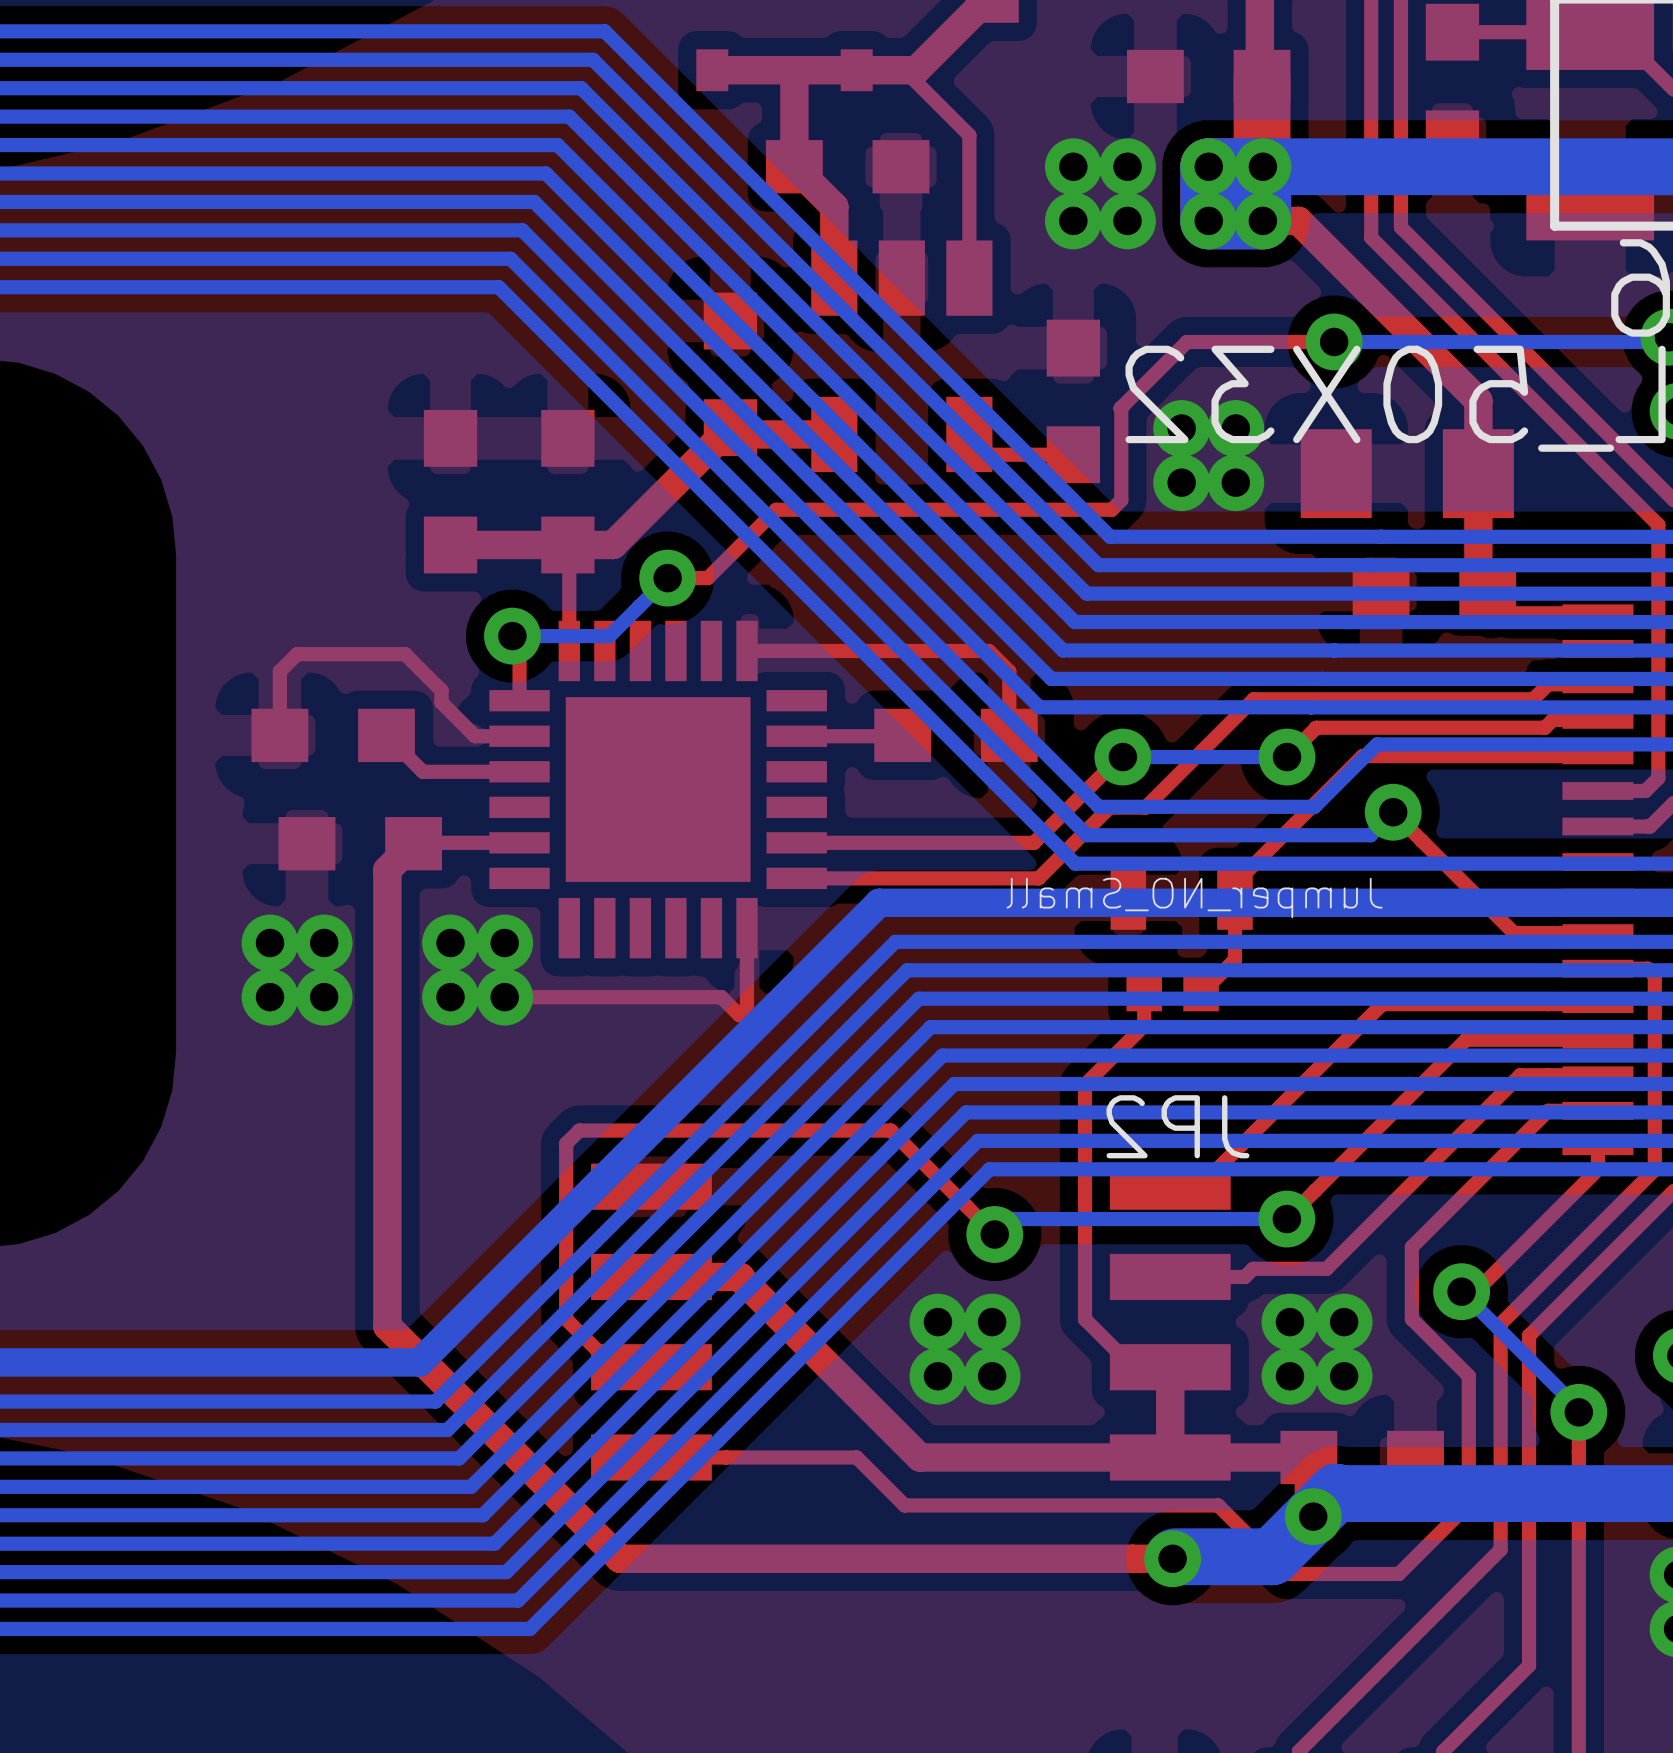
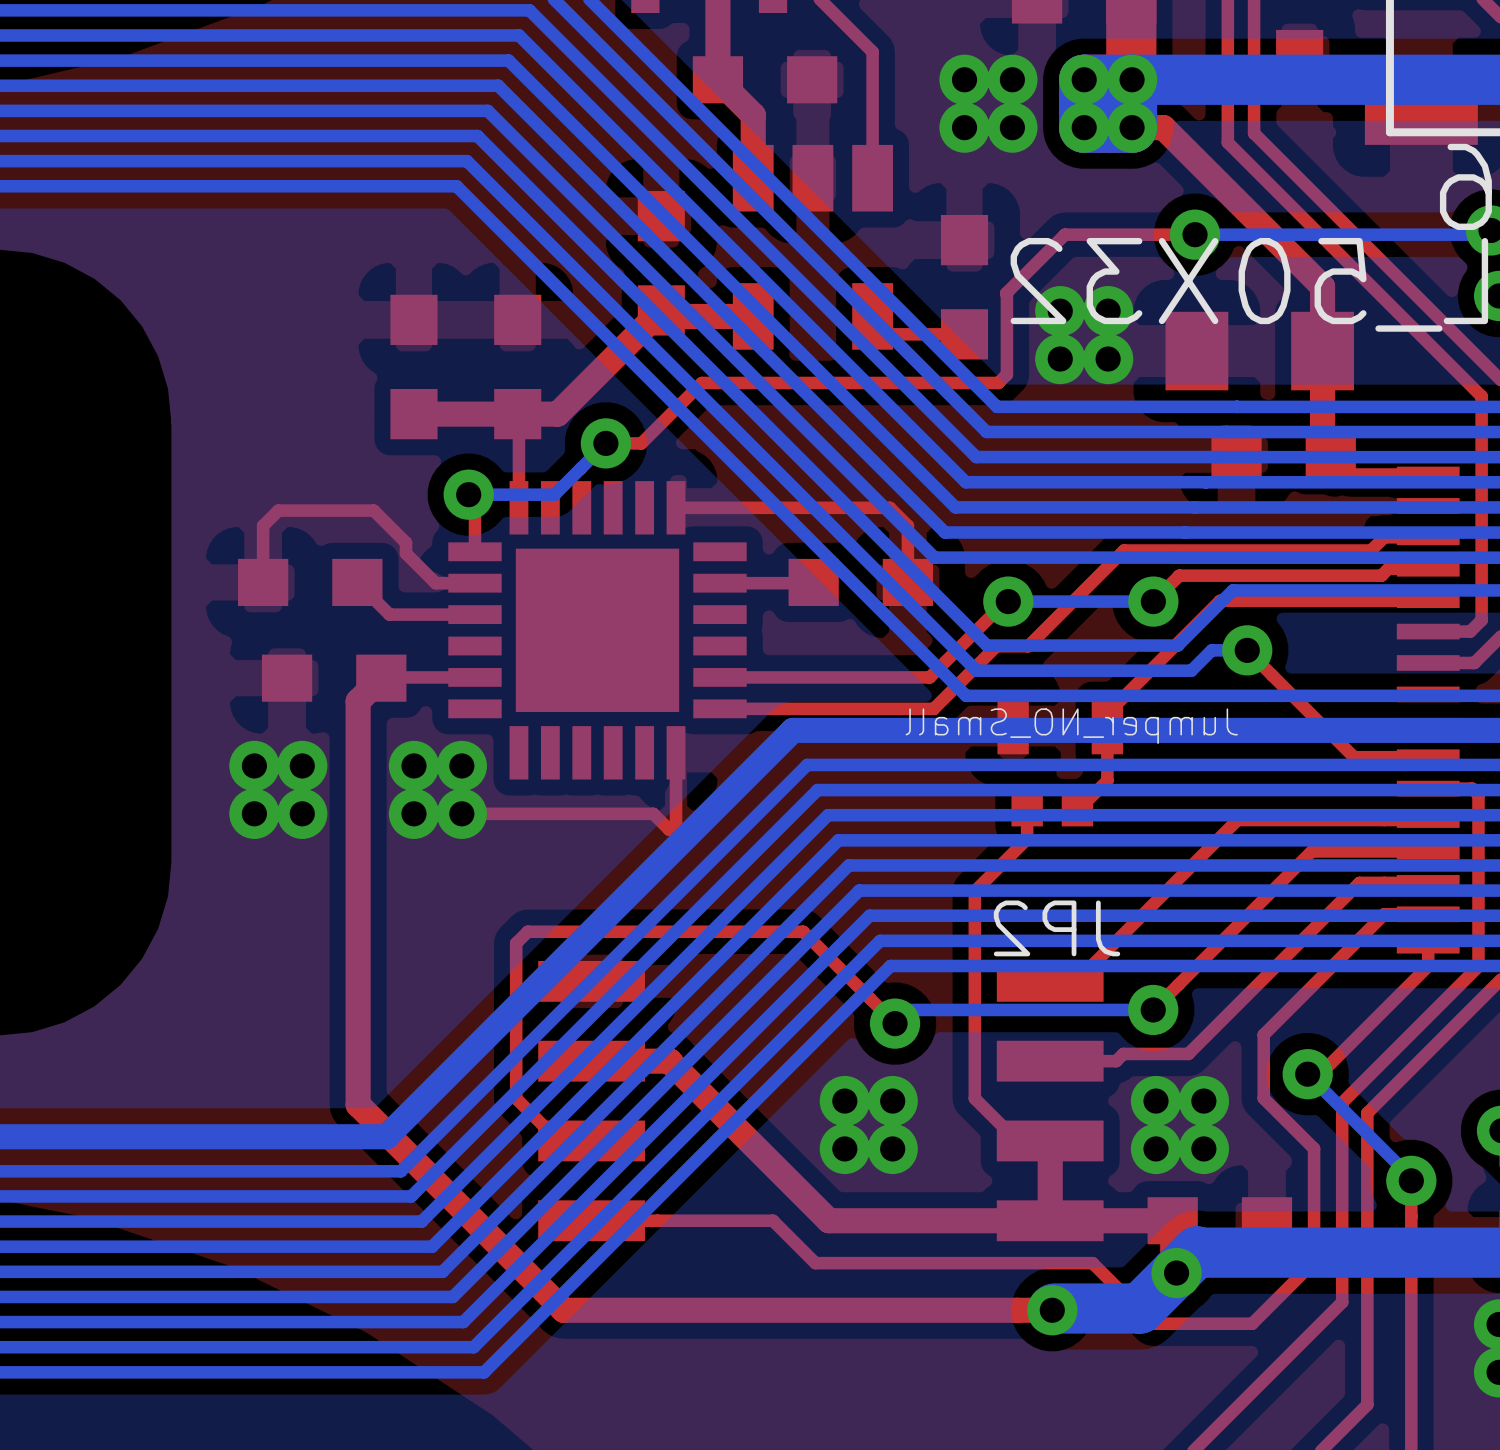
bottom track: (1393, 812) (1370, 835) (1329, 835) -> (1247, 650) (1211, 650) (1191, 670)

